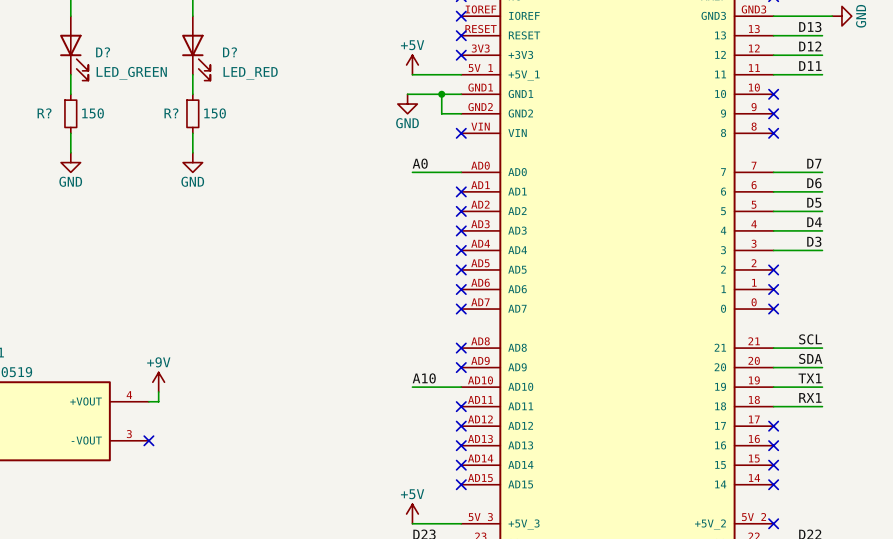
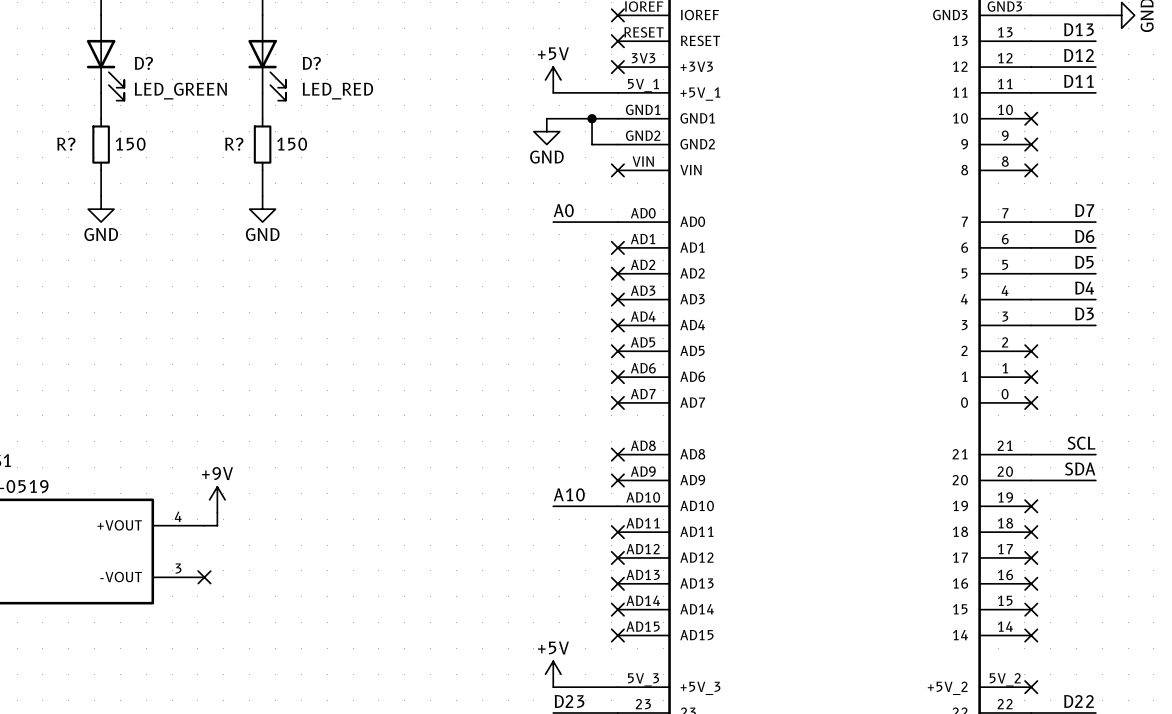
label: TX1 (810, 378) -> none
wire: (773, 387) (822, 387) -> none
no-connect mark: none -> (1031, 506)
label: RX1 (810, 397) -> none
wire: (773, 406) (822, 406) -> none
no-connect mark: none -> (1031, 532)

